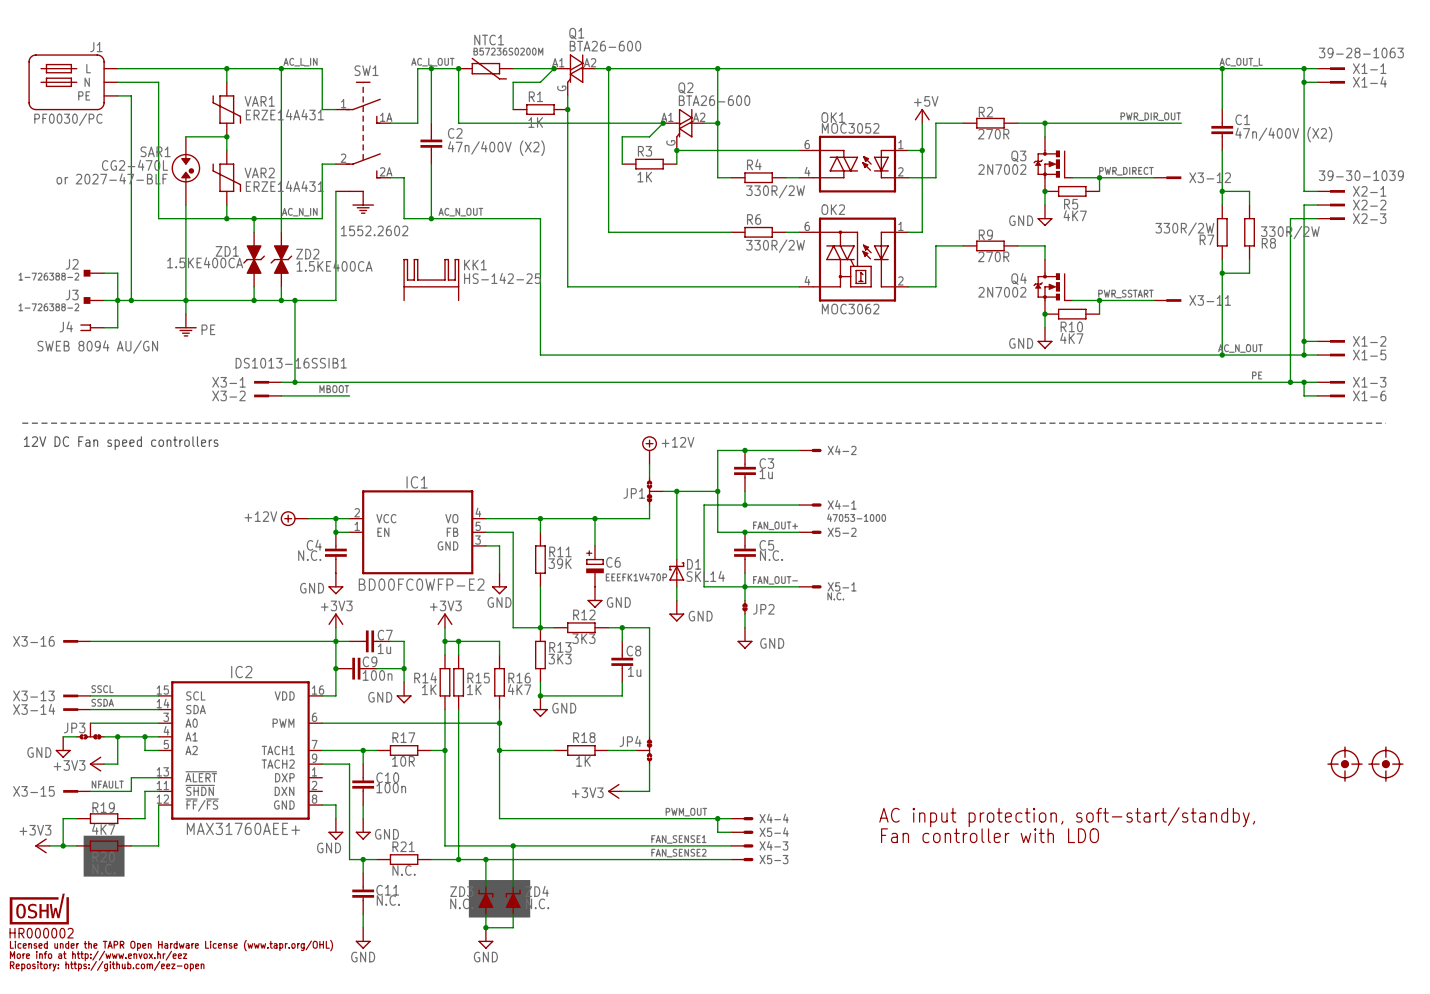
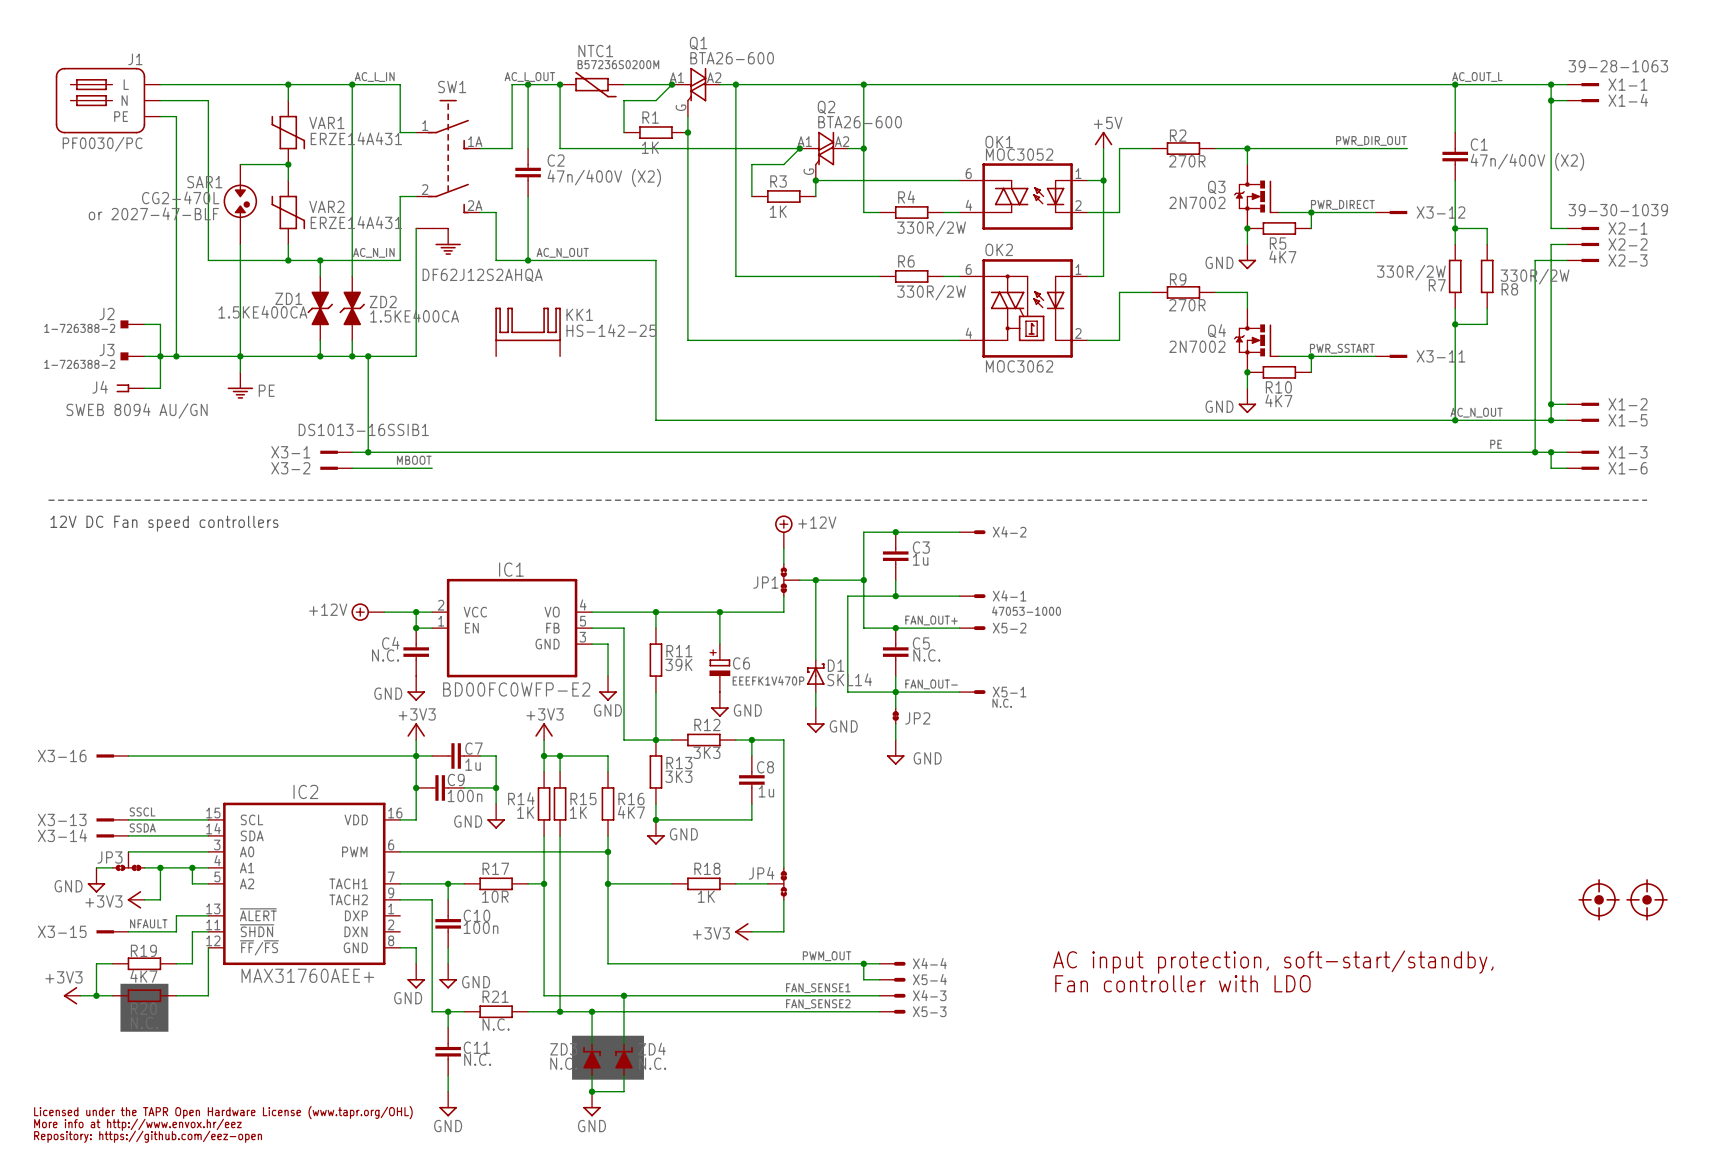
SW1 value: 1552.2602 (374, 230) -> DF62J12S2AHQA (482, 275)
part: HR000002 (39, 909) -> none

